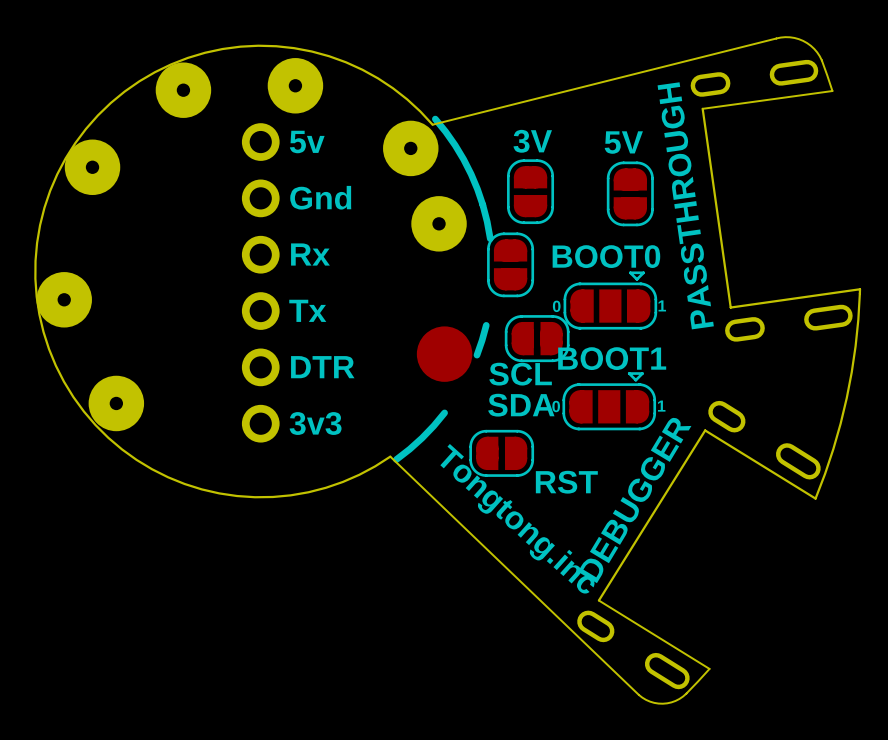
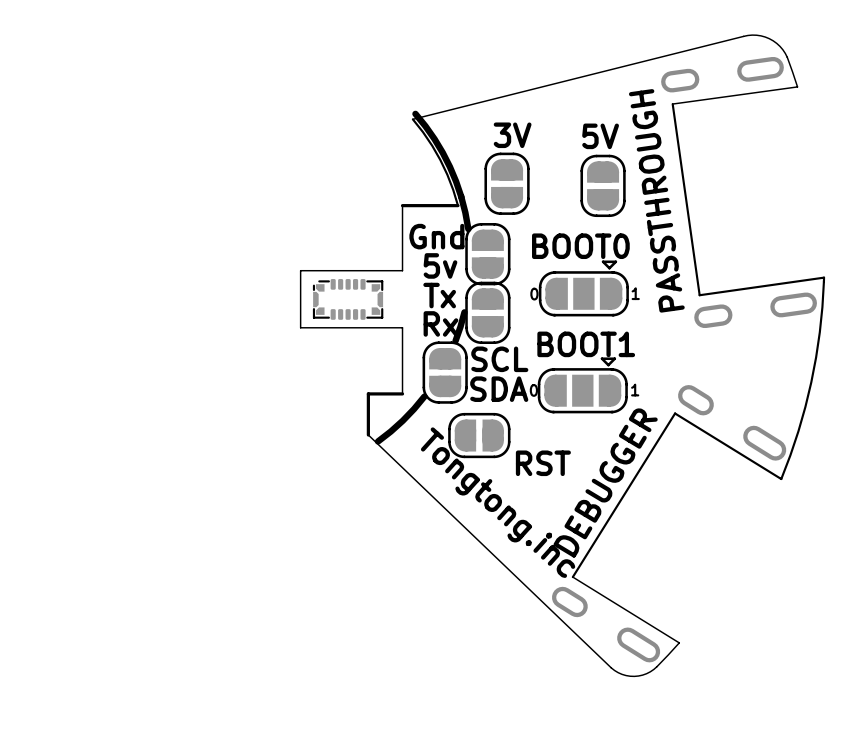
part: (295, 85) -> none
part: (183, 90) -> none
board edge: (432, 124) (407, 99) (378, 78) (346, 62) (311, 51) (276, 46) (240, 46) (205, 52) (154, 72) (124, 91) (97, 115) (75, 143) (50, 190) (40, 225) (35, 260) (36, 296) (49, 349) (73, 396) (108, 437) (151, 469) (201, 489) (237, 496) (290, 495) (342, 481) (390, 456) (638, 694) -> (412, 119) (440, 159) (457, 205) (402, 205) (402, 270) (300, 270) (300, 327) (402, 327) (402, 393) (368, 393) (368, 435) (611, 667)
part: (260, 142) -> none
text position: 5v (307, 142) -> 5v (440, 265)
part: (410, 148) -> none
part: (92, 167) -> none
text position: Gnd (320, 197) -> Gnd (436, 236)
part: (260, 198) -> none
part: (439, 223) -> none
part: (260, 254) -> none
text position: Rx (310, 254) -> Rx (440, 323)
part: (64, 299) -> none
text position: Tx (307, 310) -> Tx (439, 295)
part: (260, 311) -> none
part: none -> (348, 299)
part: none -> (487, 312)
part: (537, 338) -> none
part: (444, 354) -> none
part: (260, 367) -> none
text: DTR (322, 367) -> none
part: none -> (445, 372)
part: (116, 403) -> none
part: (260, 423) -> none
text: 3v3 (315, 423) -> none

